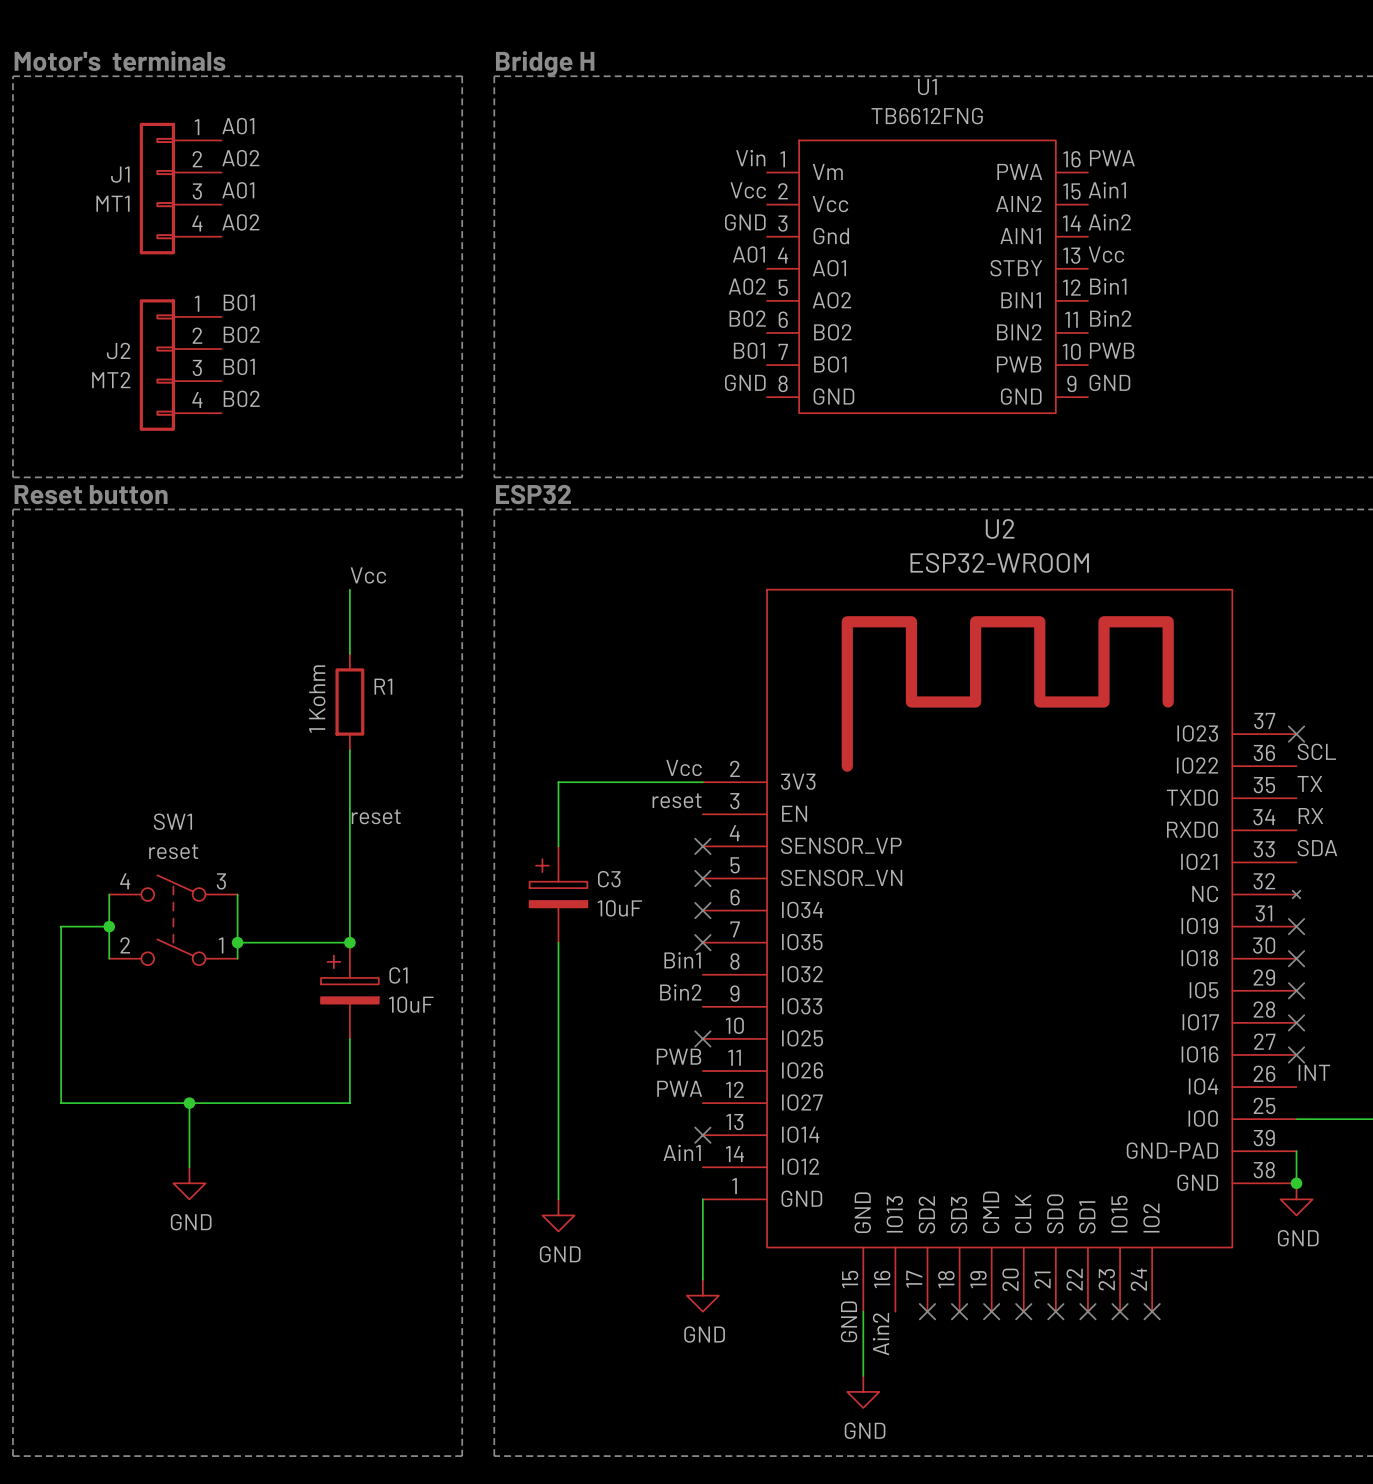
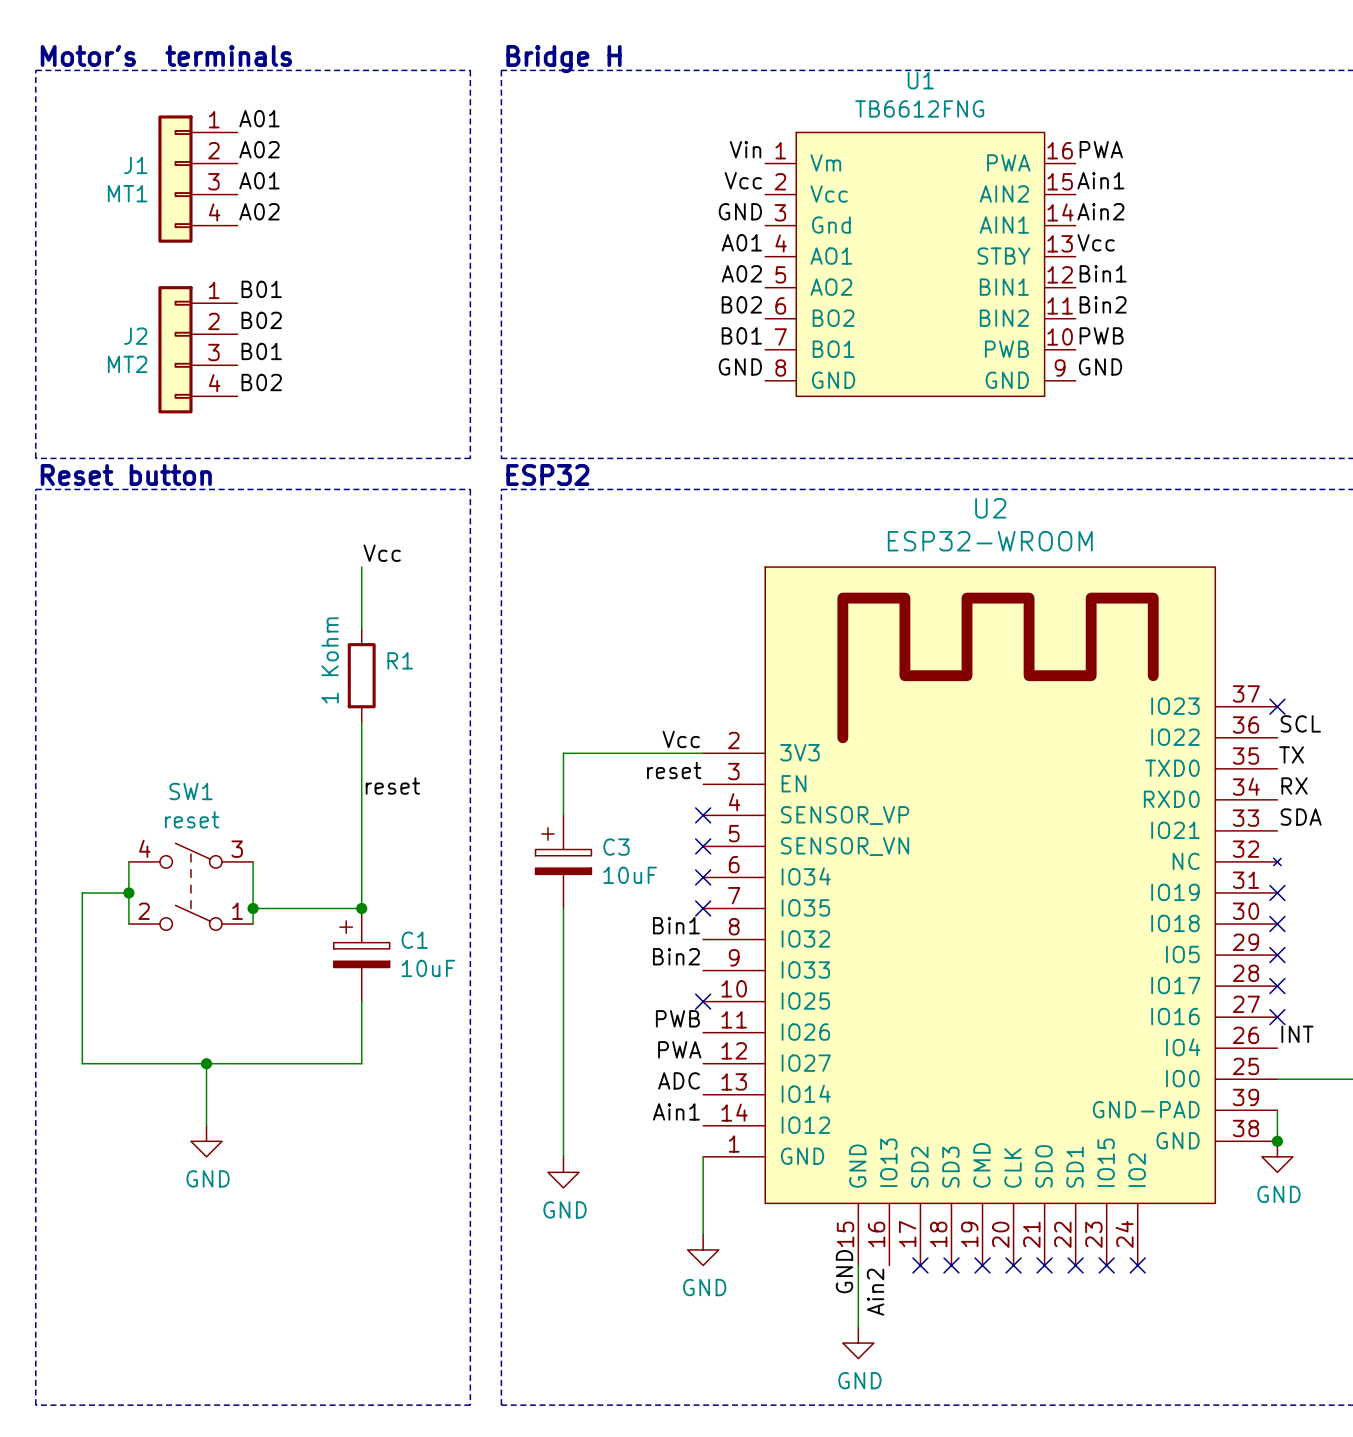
label: none -> ADC (679, 1080)
no-connect mark: (702, 1135) -> none

